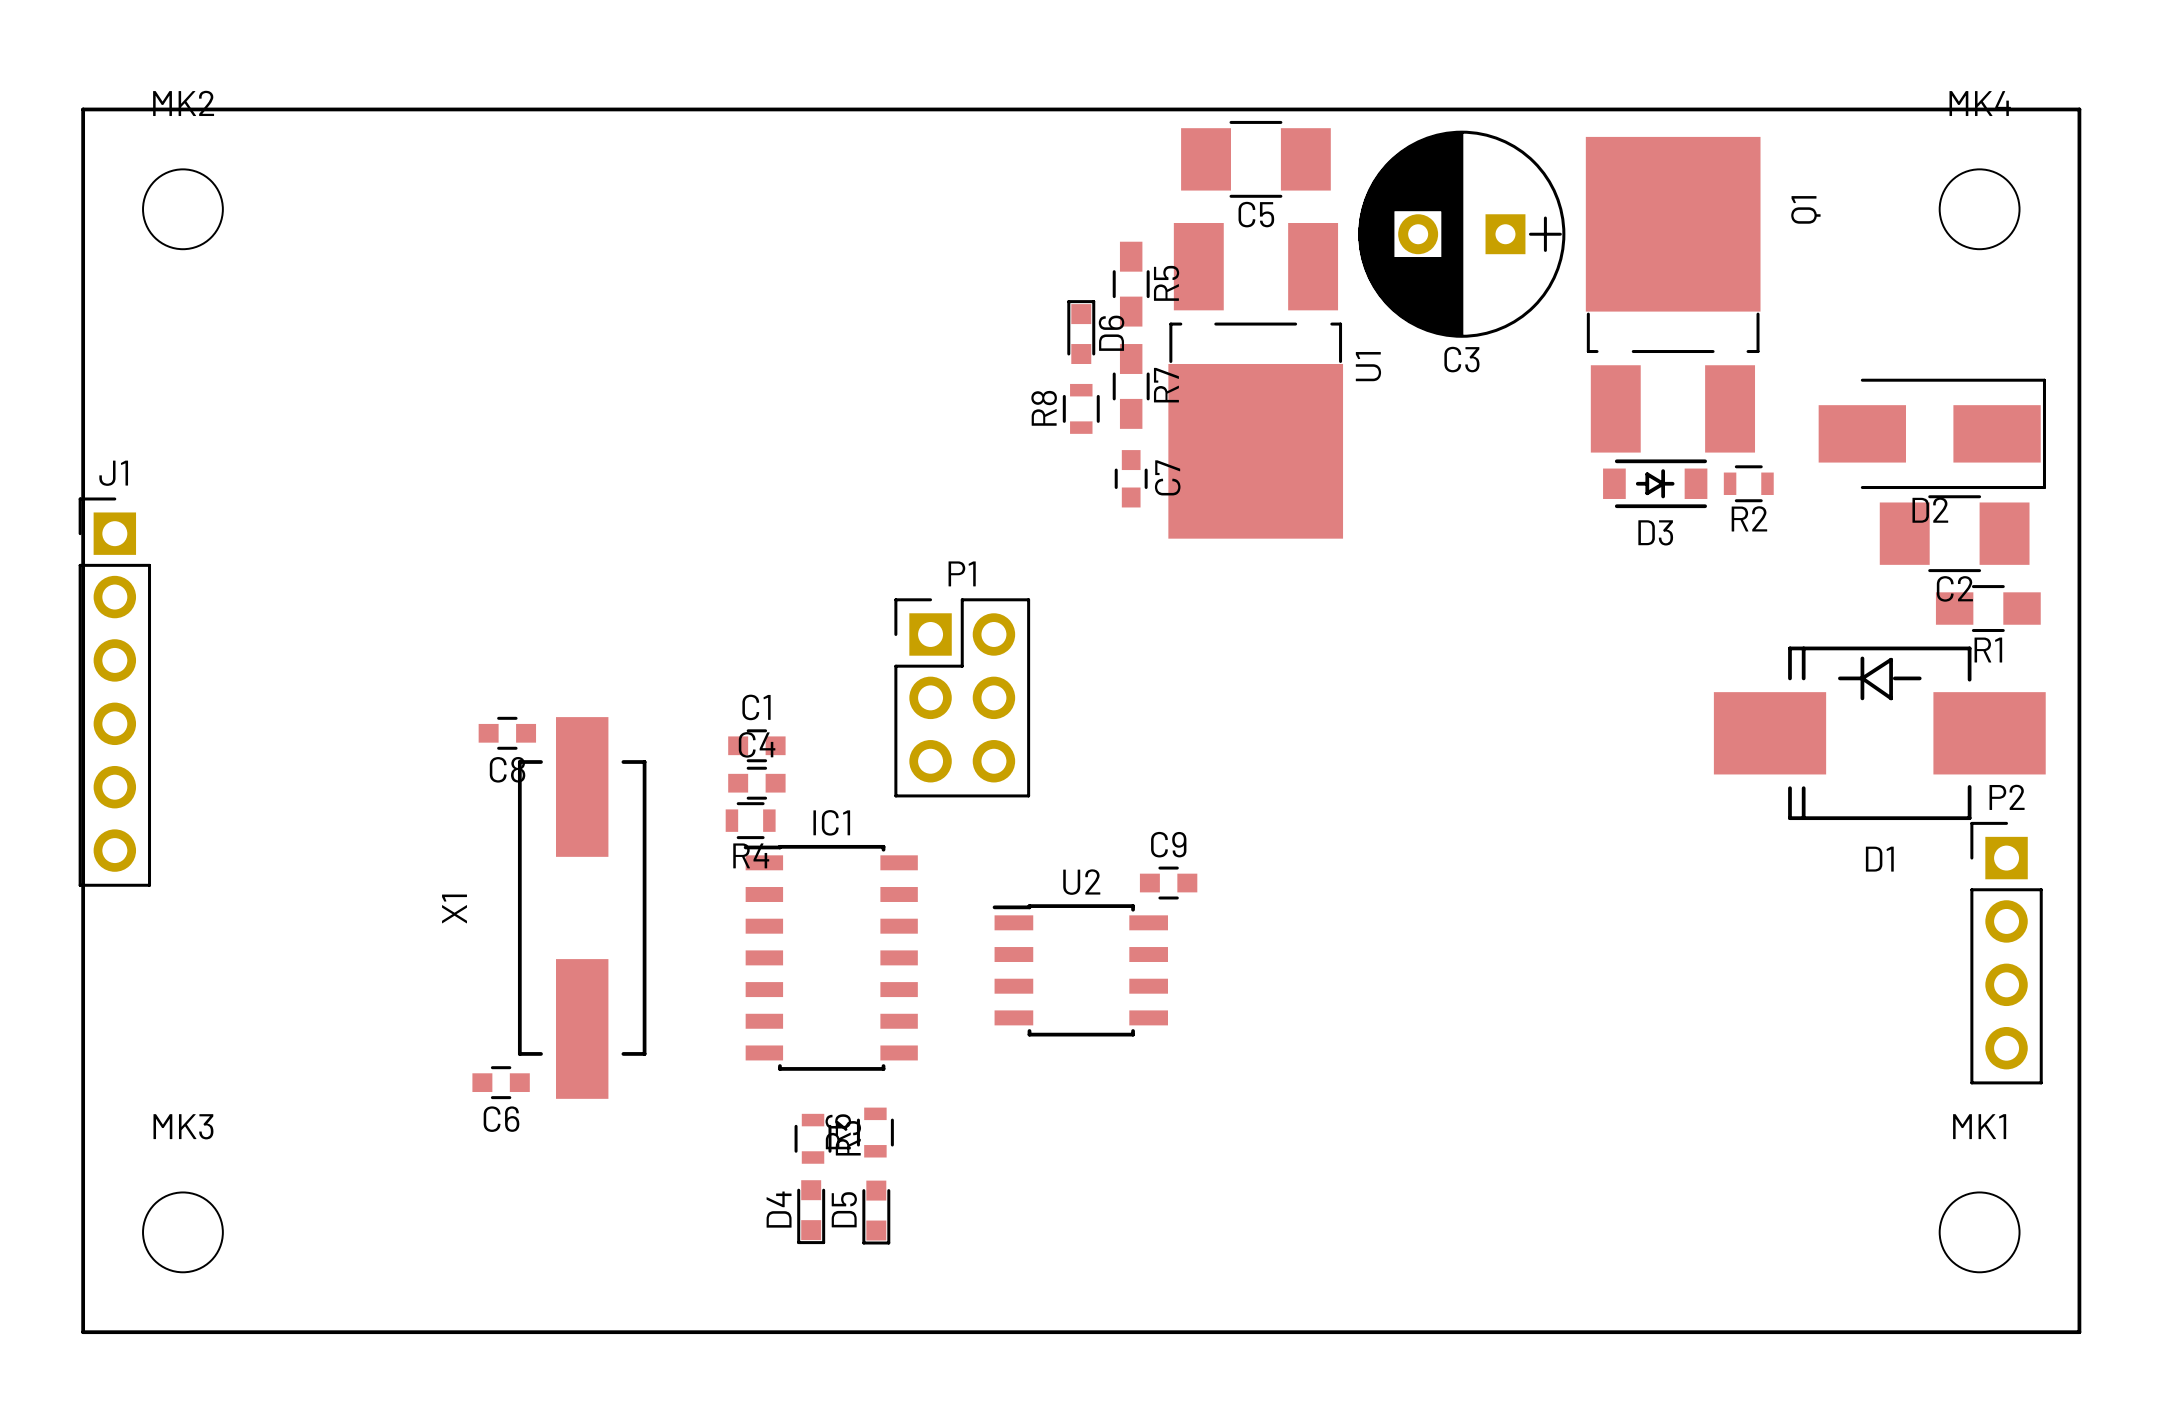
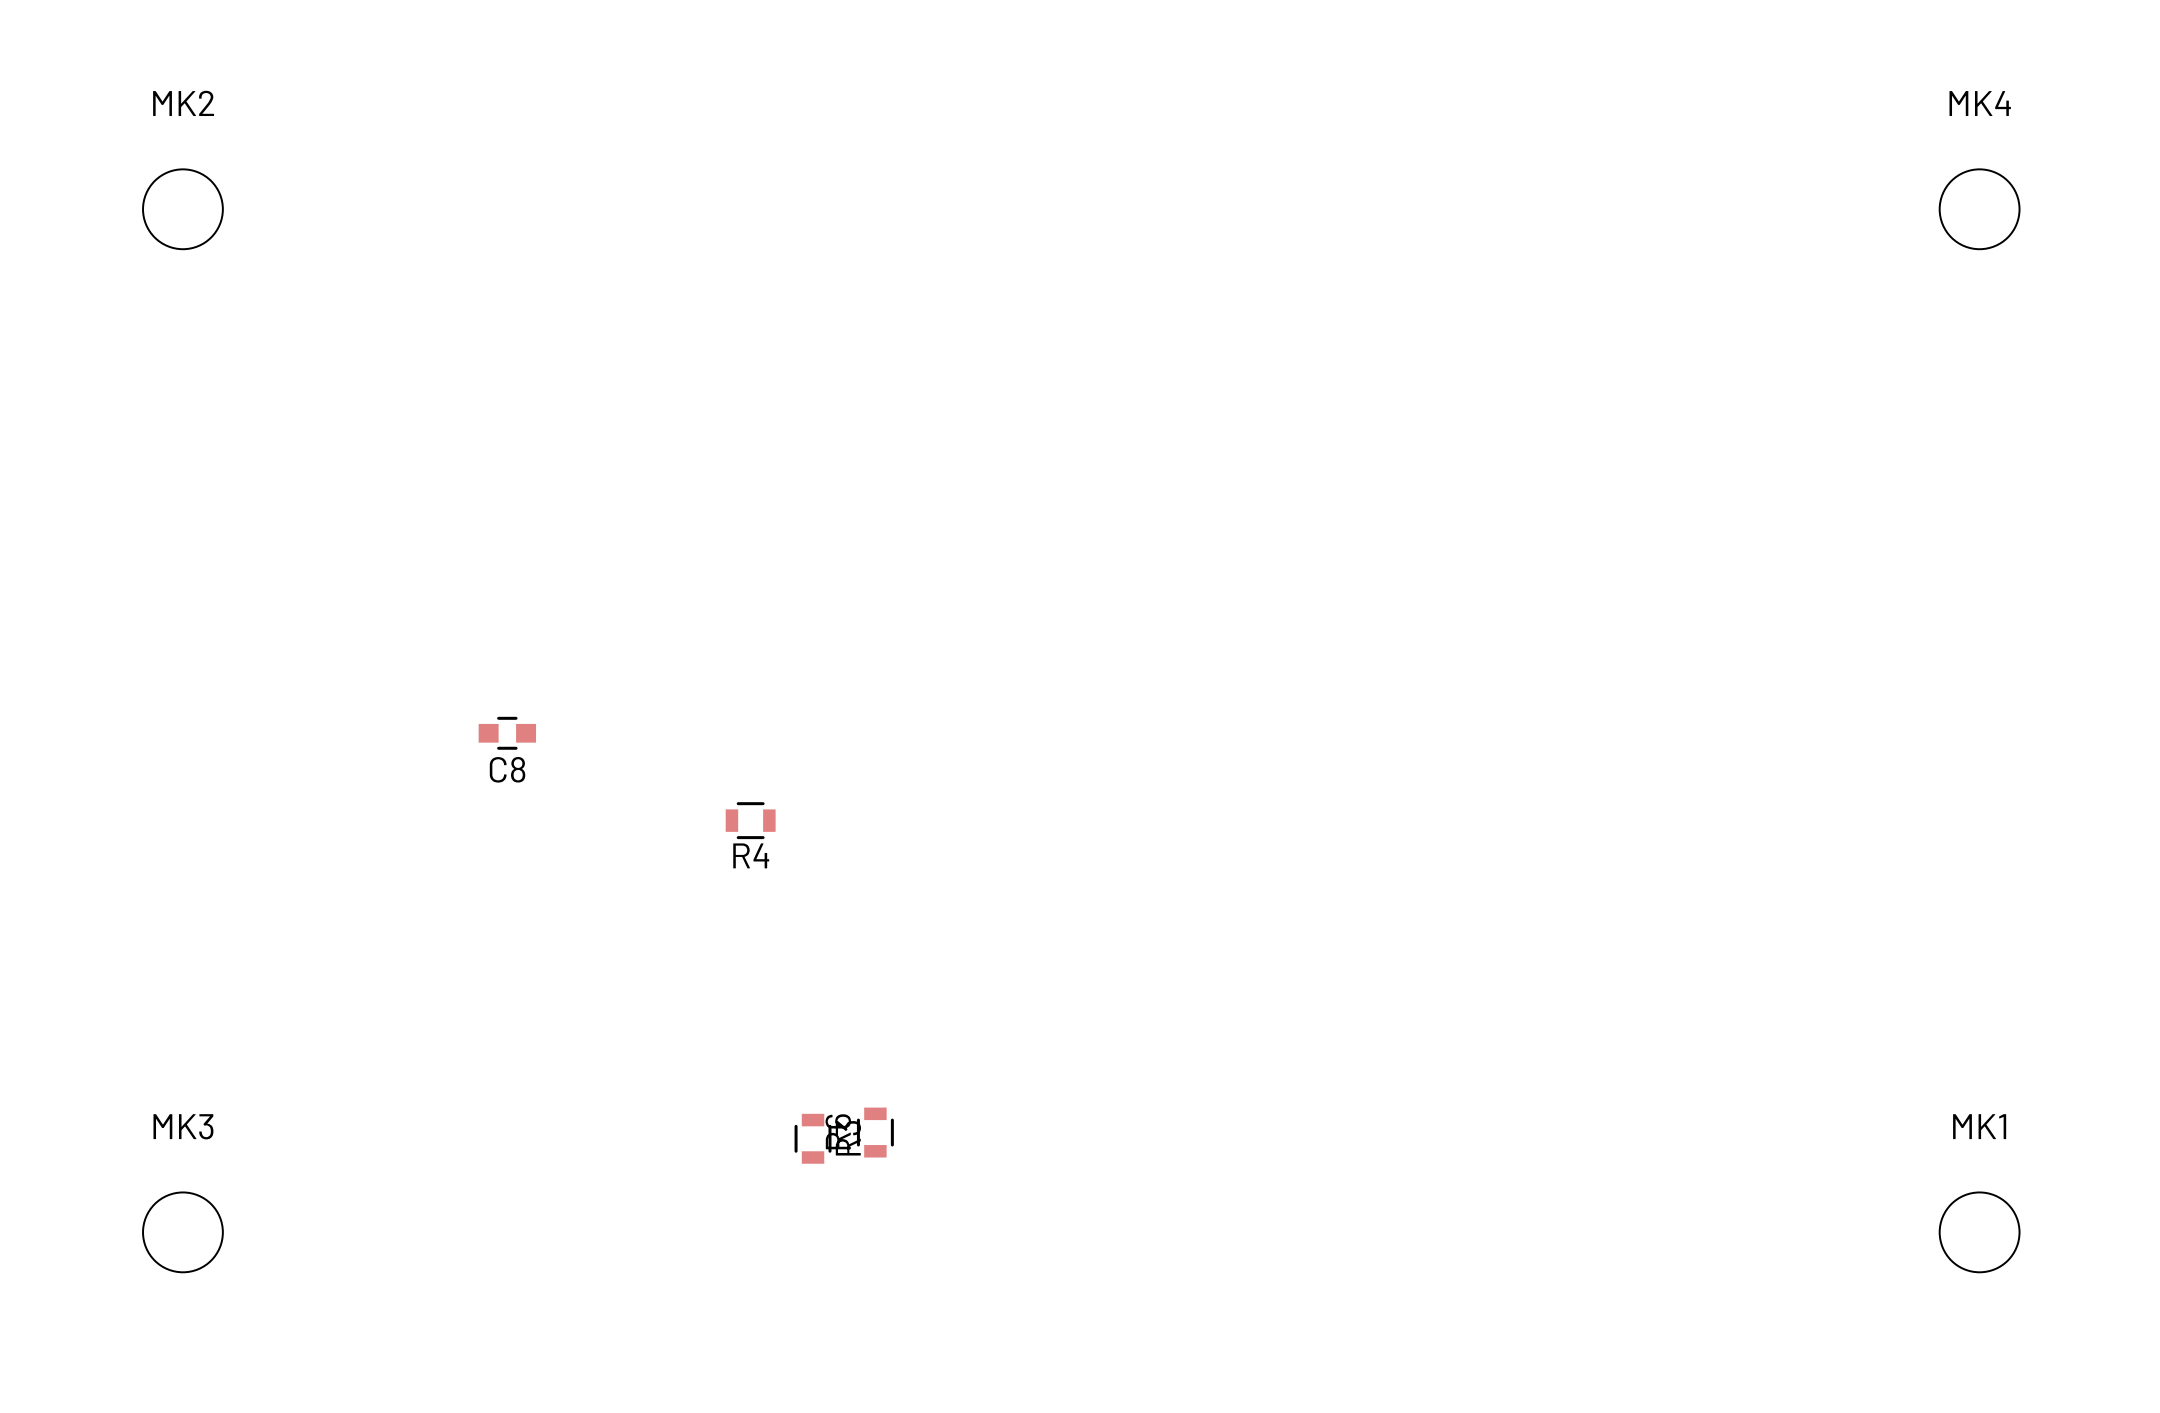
board edge: (83, 109) (2079, 109) (2079, 1332) (83, 1332) (83, 109) -> none
C5: (1255, 159) -> none
C3: (1461, 234) -> none
R5: (1131, 284) -> none
Q1: (1673, 294) -> none
D6: (1081, 332) -> none
U1: (1255, 380) -> none
R7: (1131, 386) -> none
R8: (1081, 408) -> none
D2: (1932, 433) -> none
C7: (1131, 478) -> none
D3: (1655, 483) -> none
R2: (1748, 483) -> none
C2: (1954, 533) -> none
R1: (1988, 608) -> none
J1: (114, 692) -> none
P1: (962, 697) -> none
D1: (1879, 733) -> none
C1: (756, 745) -> none
C4: (756, 783) -> none
C9: (1168, 883) -> none
X1: (582, 907) -> none
P2: (2006, 953) -> none
IC1: (830, 957) -> none
U2: (1080, 970) -> none
C6: (501, 1082) -> none
D4: (811, 1212) -> none
D5: (876, 1212) -> none

